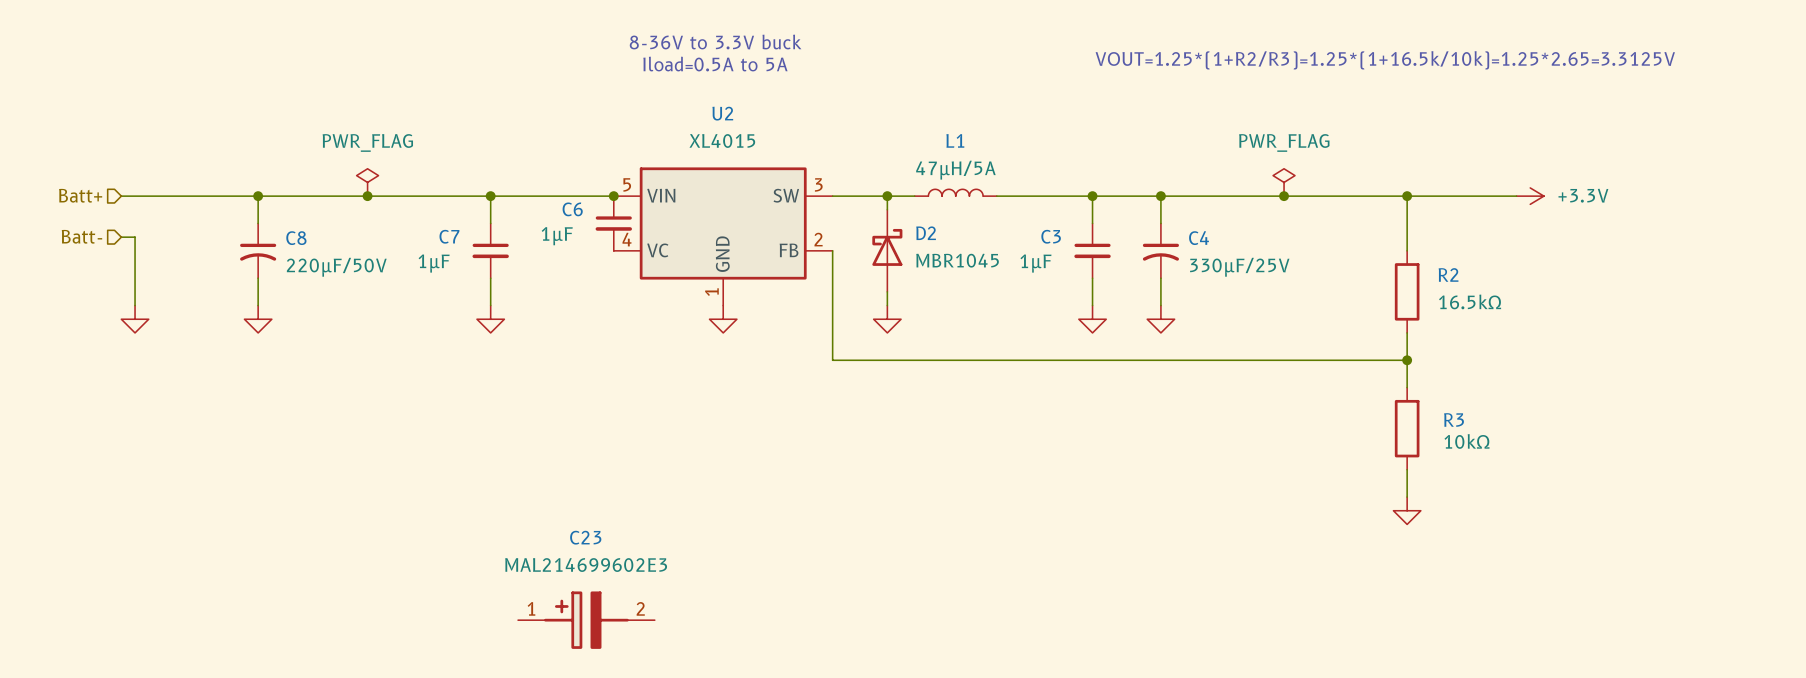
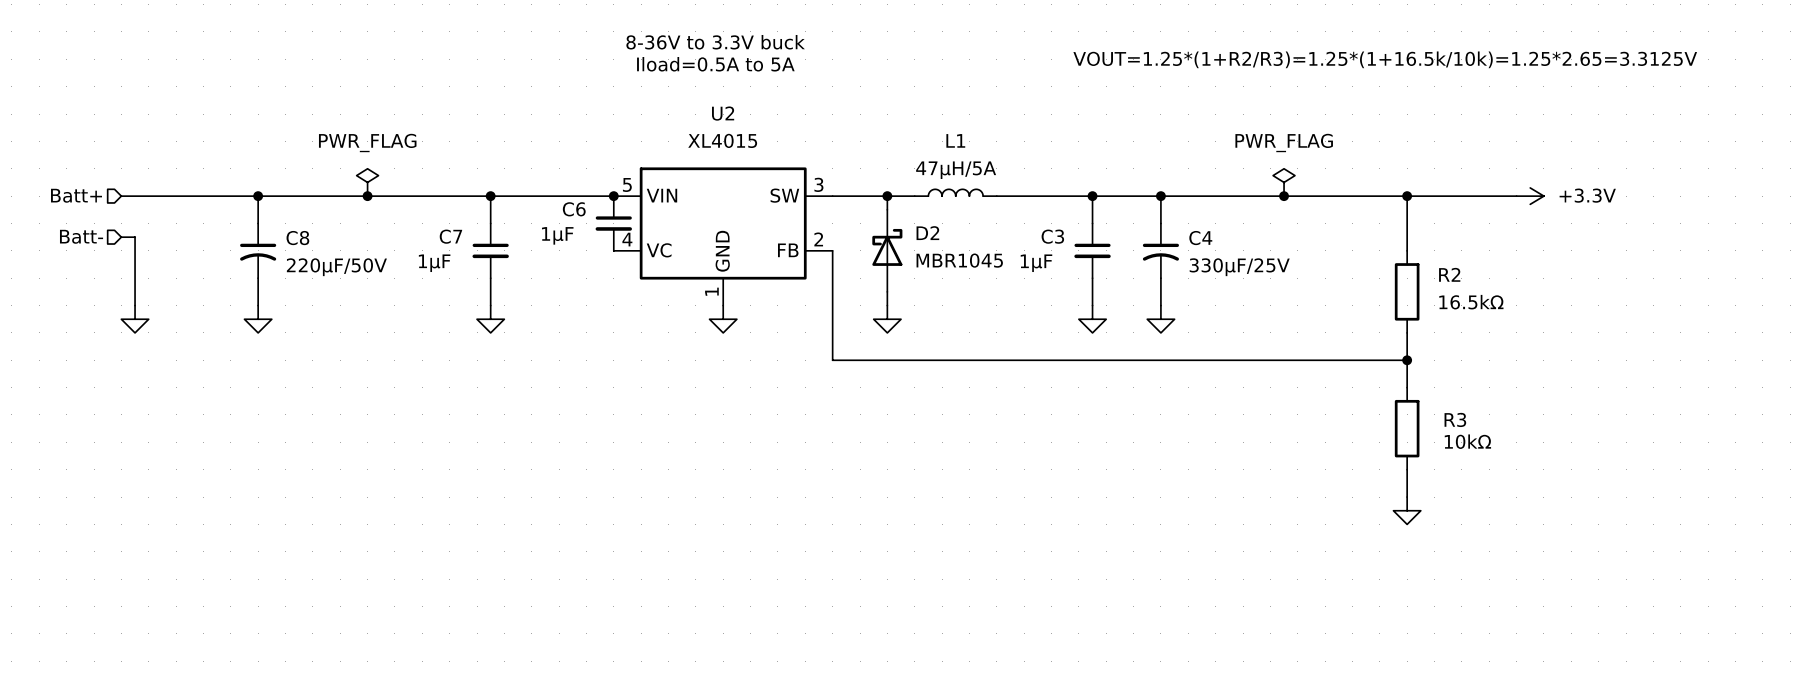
C23: MAL214699602E3 (586, 620) -> none

